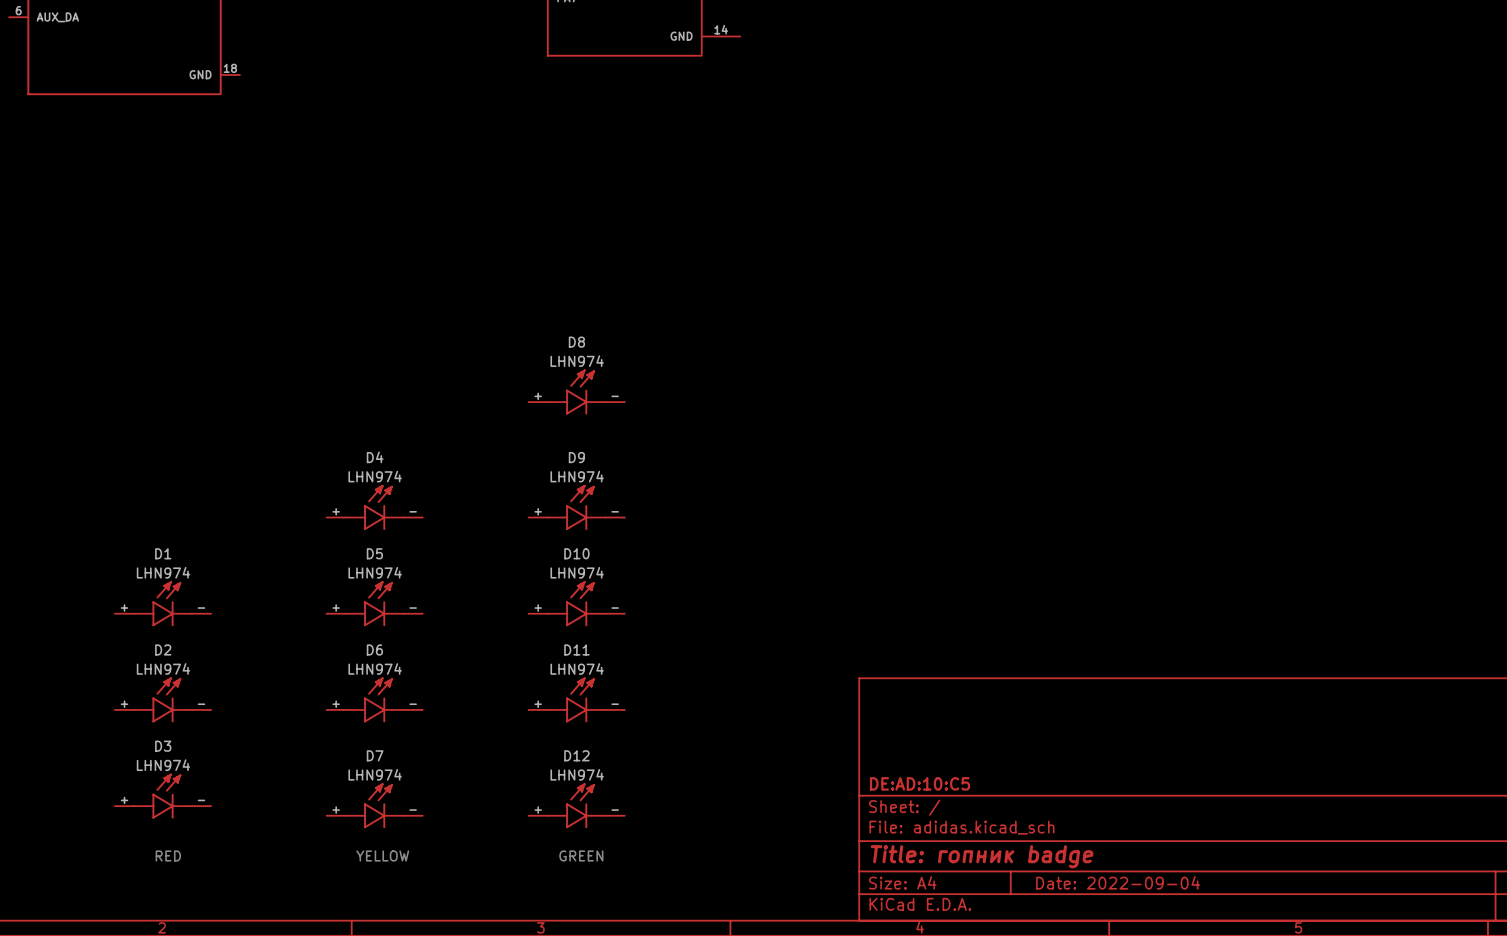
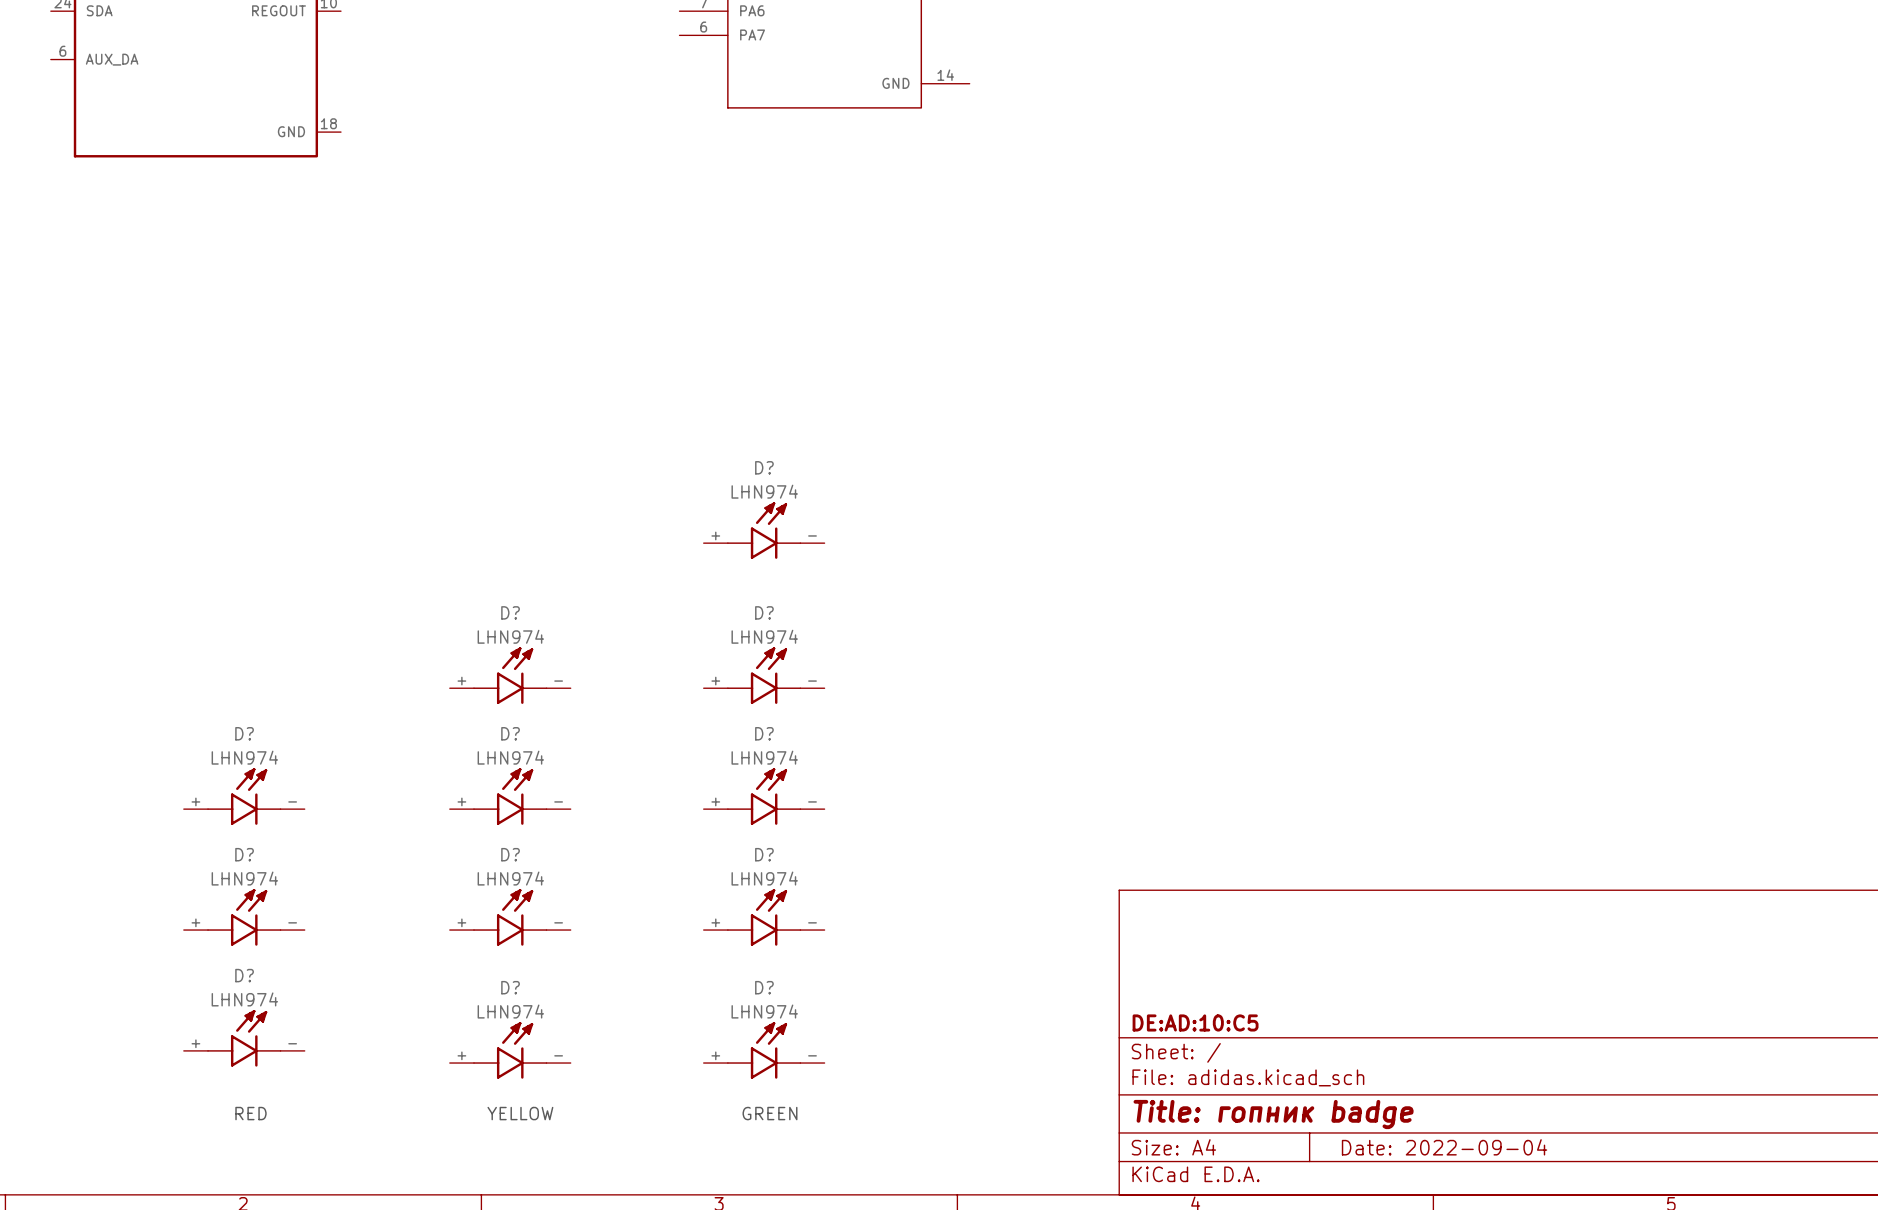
D8 name: D8 (576, 342) -> D? (764, 467)
D4 name: D4 (375, 457) -> D? (510, 612)
D9 name: D9 (576, 457) -> D? (764, 612)
D1 name: D1 (163, 553) -> D? (244, 733)
D5 name: D5 (374, 553) -> D? (510, 733)
D10 name: D10 (576, 553) -> D? (764, 733)
D2 name: D2 (163, 649) -> D? (244, 854)
D6 name: D6 (374, 649) -> D? (510, 854)
D11 name: D11 (576, 649) -> D? (764, 854)
D3 name: D3 (163, 746) -> D? (244, 975)
D7 name: D7 (375, 755) -> D? (510, 987)
D12 name: D12 (576, 755) -> D? (764, 987)

